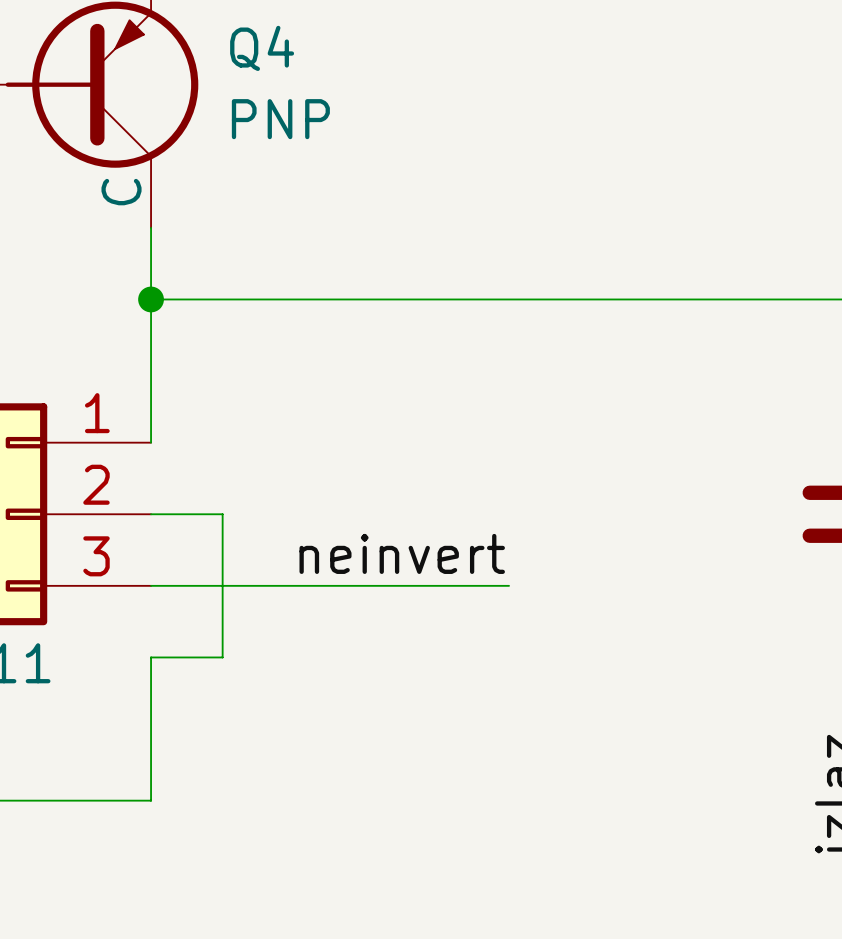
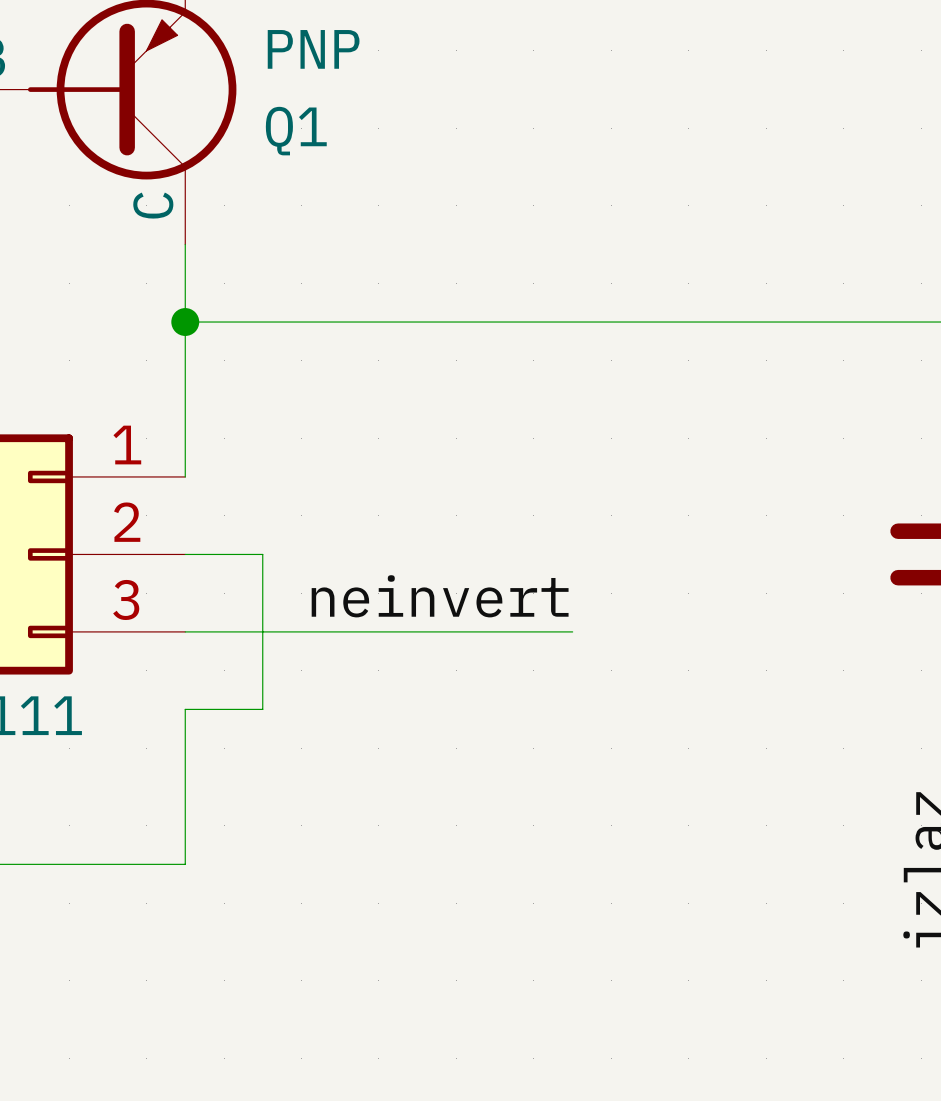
Q4 name: Q4 (262, 48) -> Q1 (296, 131)
Q4 value position: PNP (280, 119) -> PNP (313, 49)

